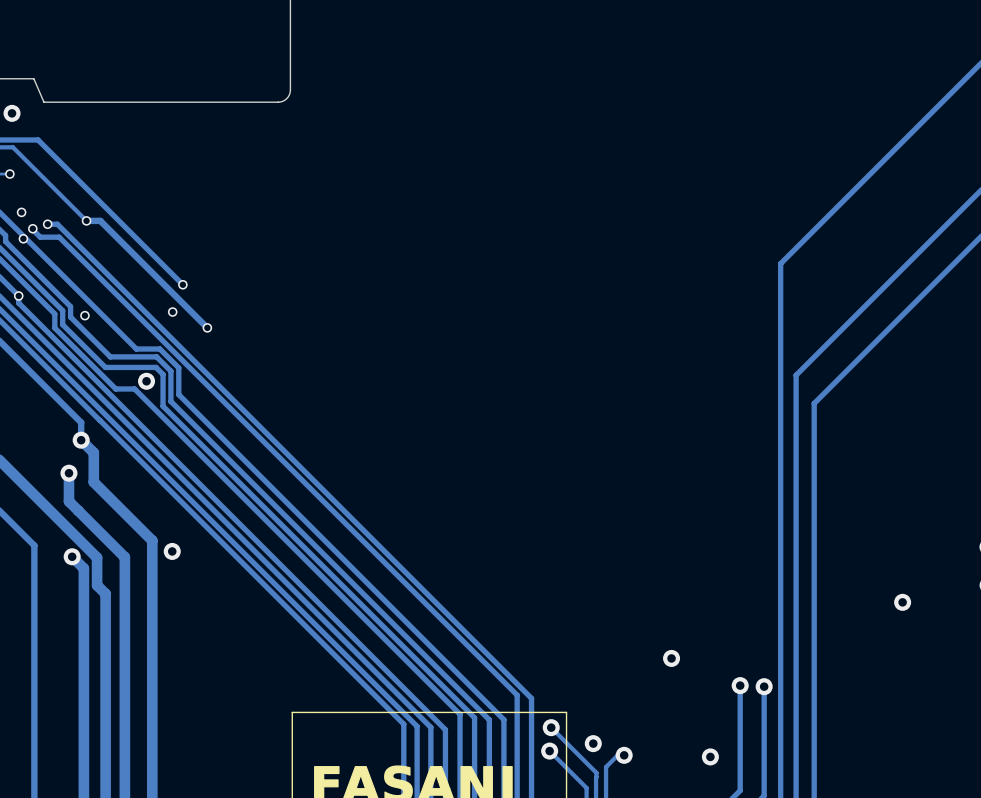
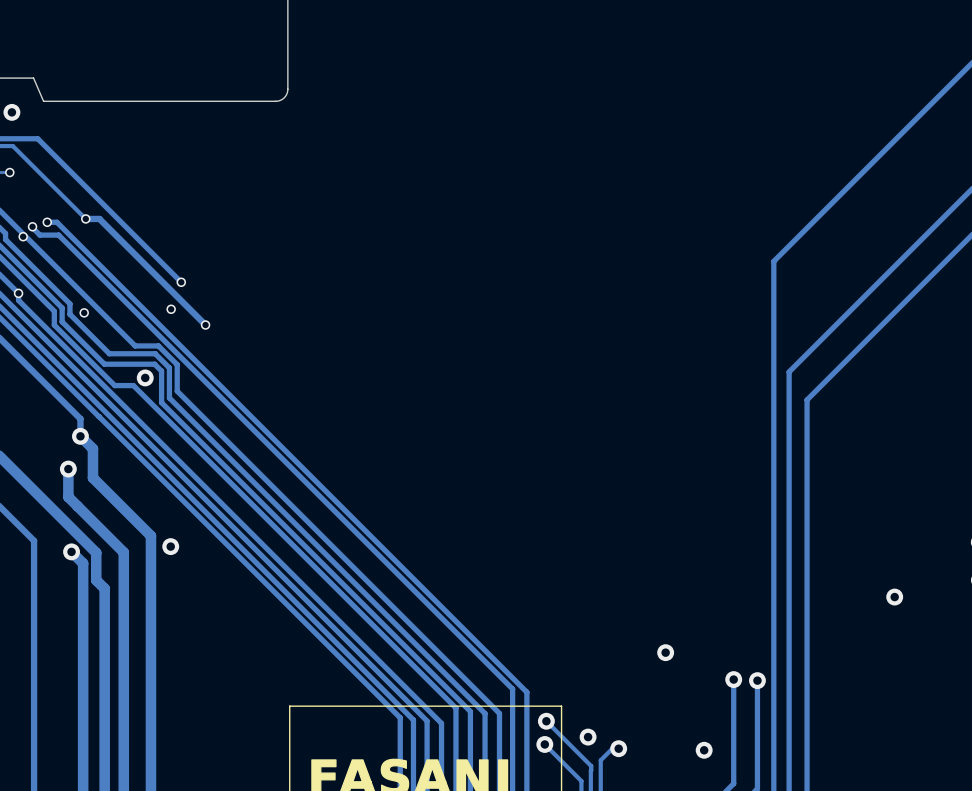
via: (21, 212) -> none

